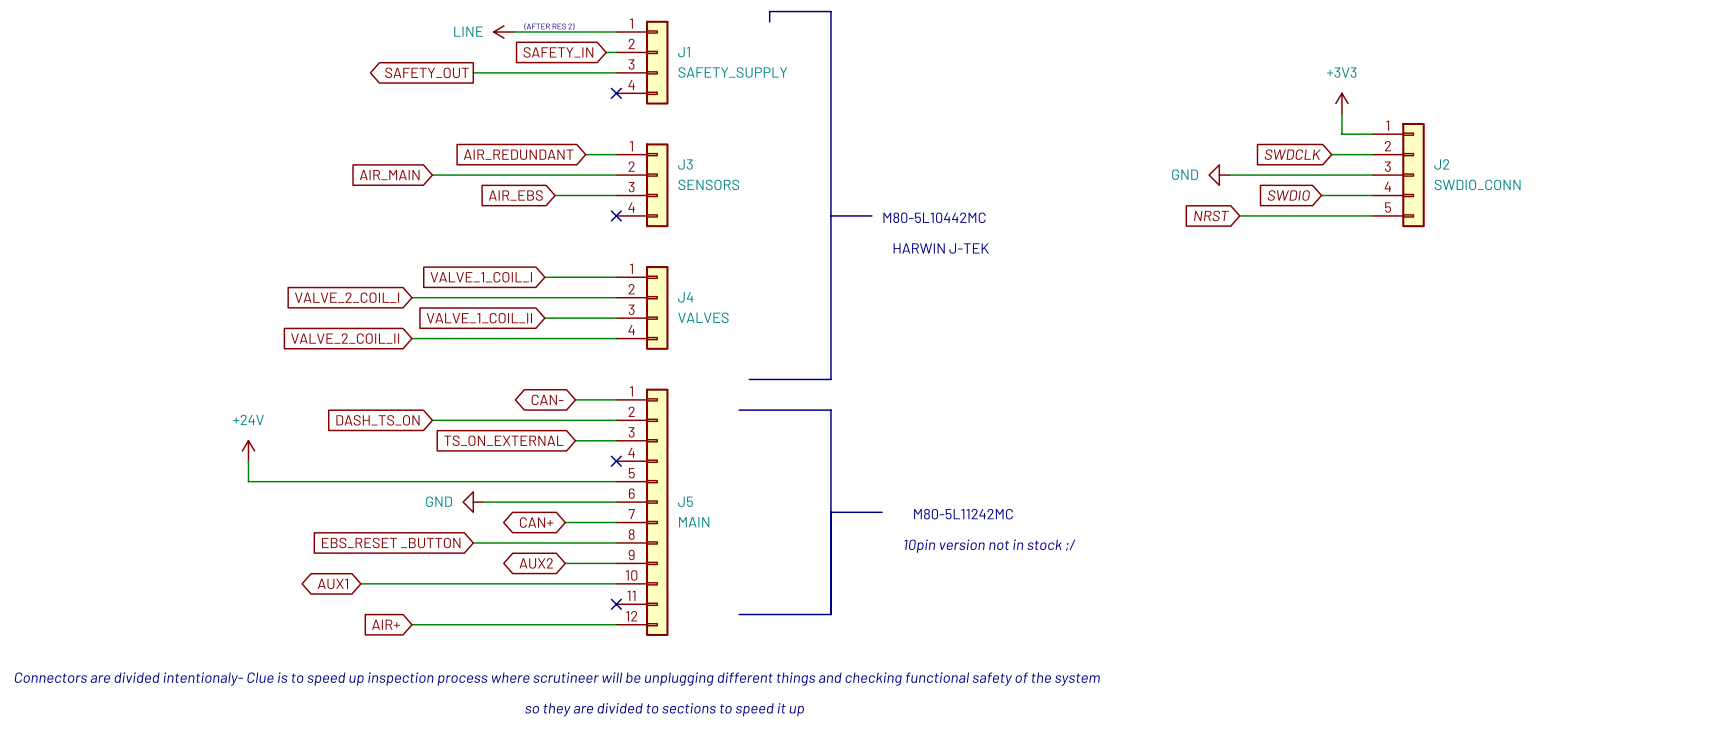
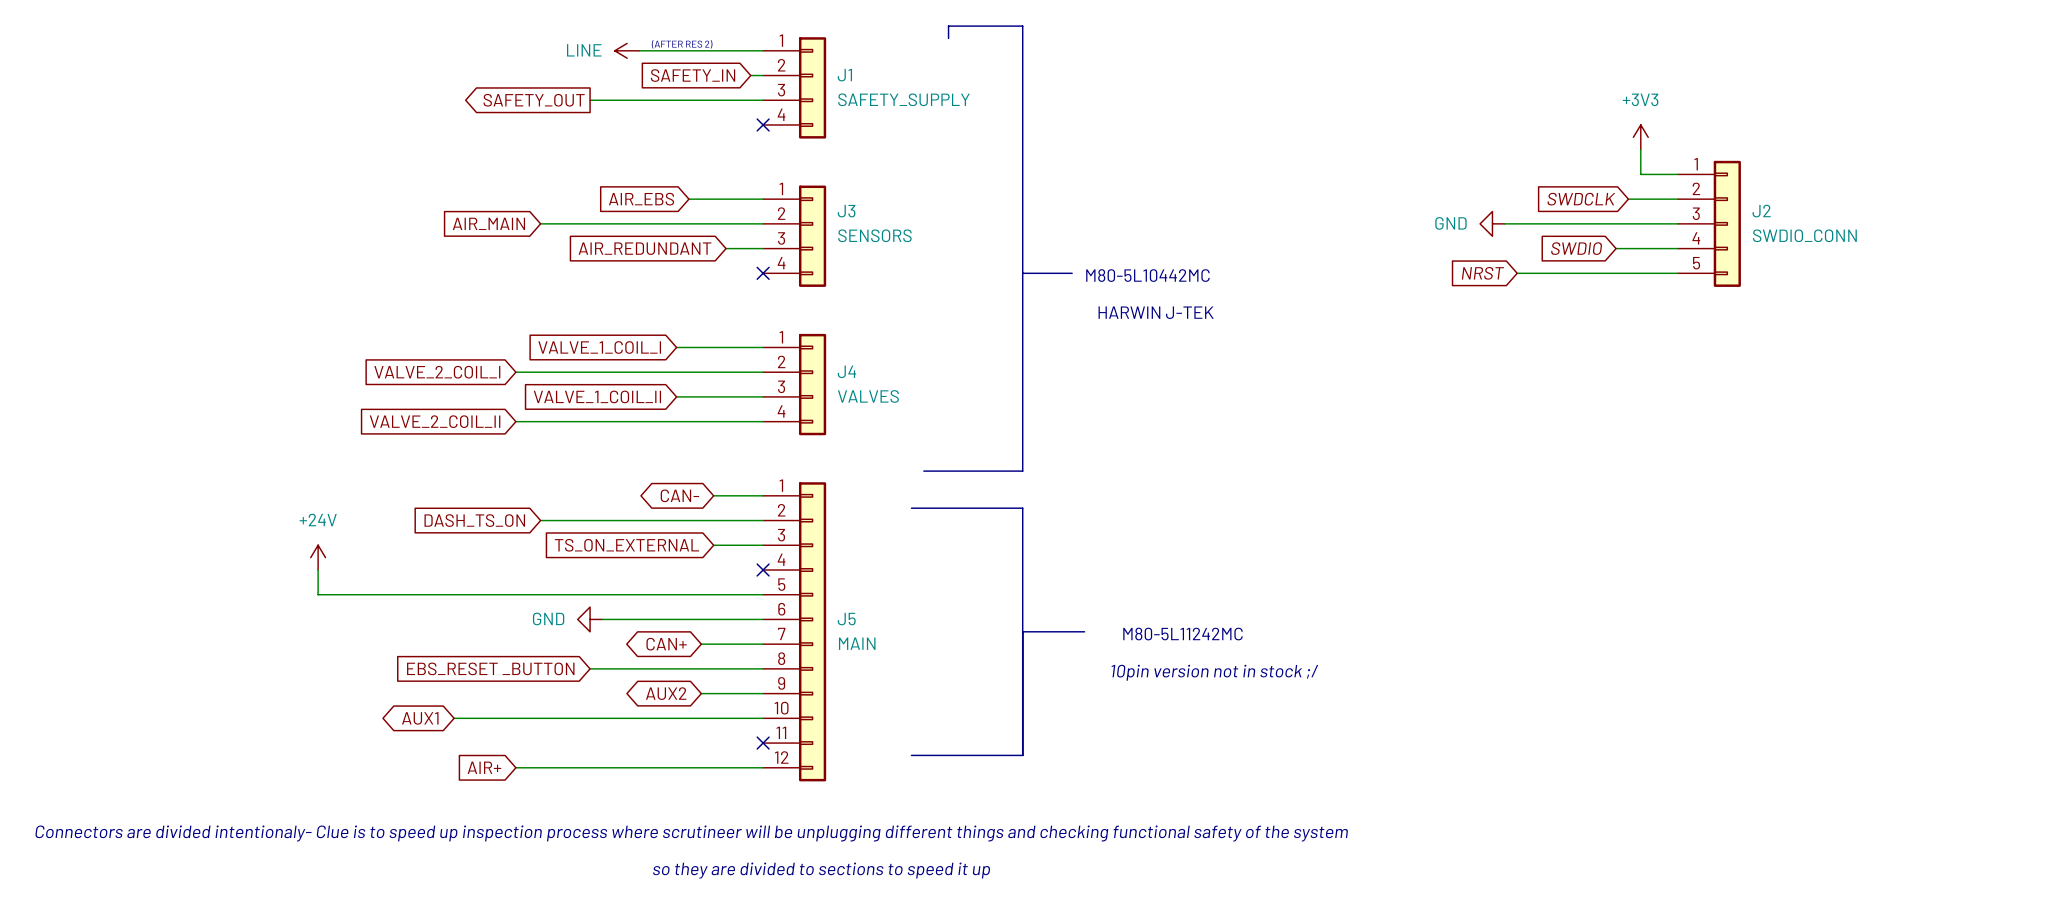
global label position: AIR_REDUNDANT (518, 154) -> AIR_REDUNDANT (645, 248)
global label position: AIR_EBS (515, 195) -> AIR_EBS (641, 199)
wire: (555, 195) (585, 195) -> (688, 199) (726, 199)

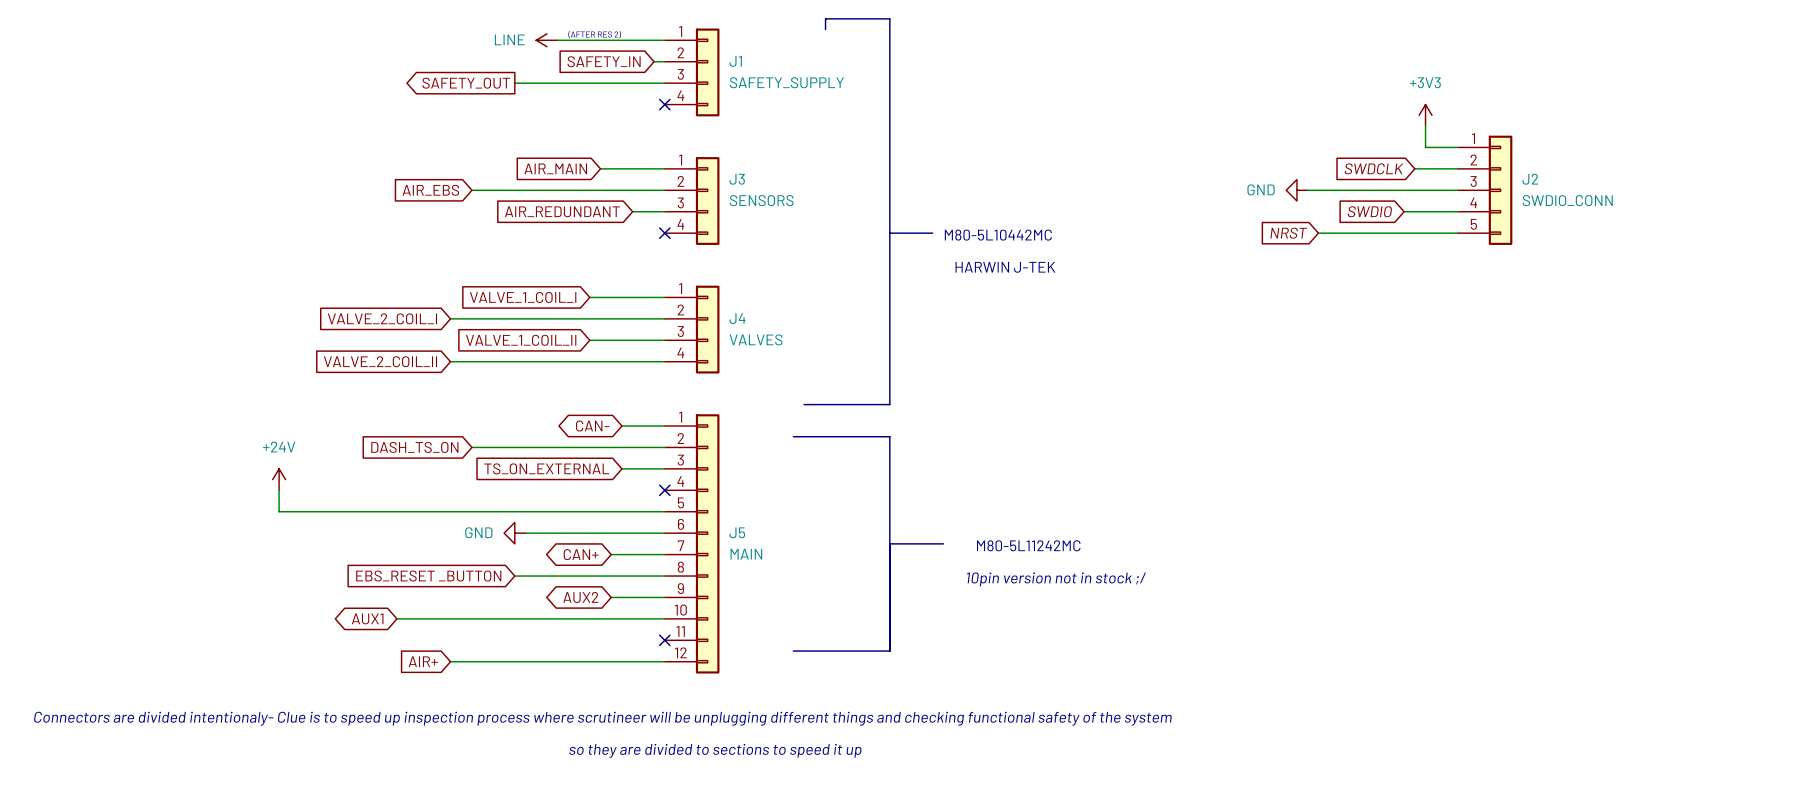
global label: AIR_EBS (641, 199) -> AIR_MAIN (555, 168)
global label: AIR_MAIN (488, 223) -> AIR_EBS (430, 190)

